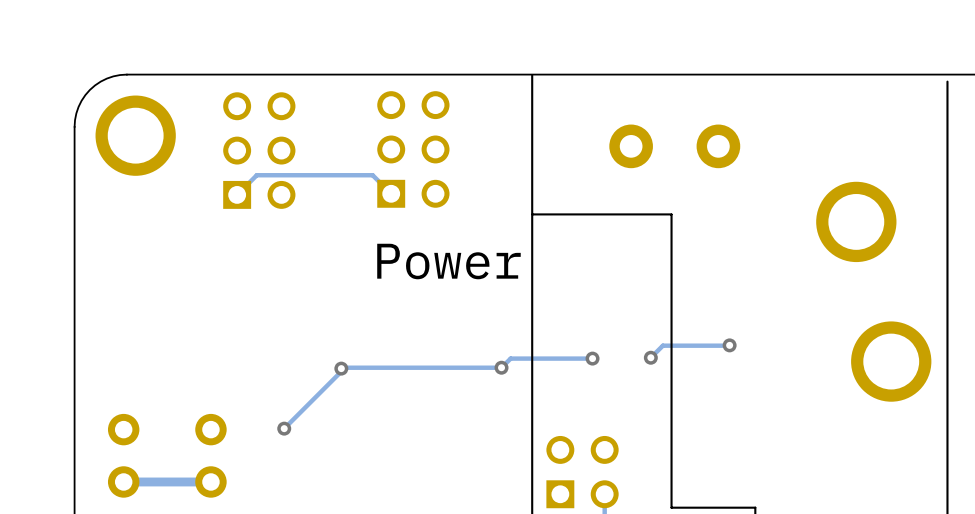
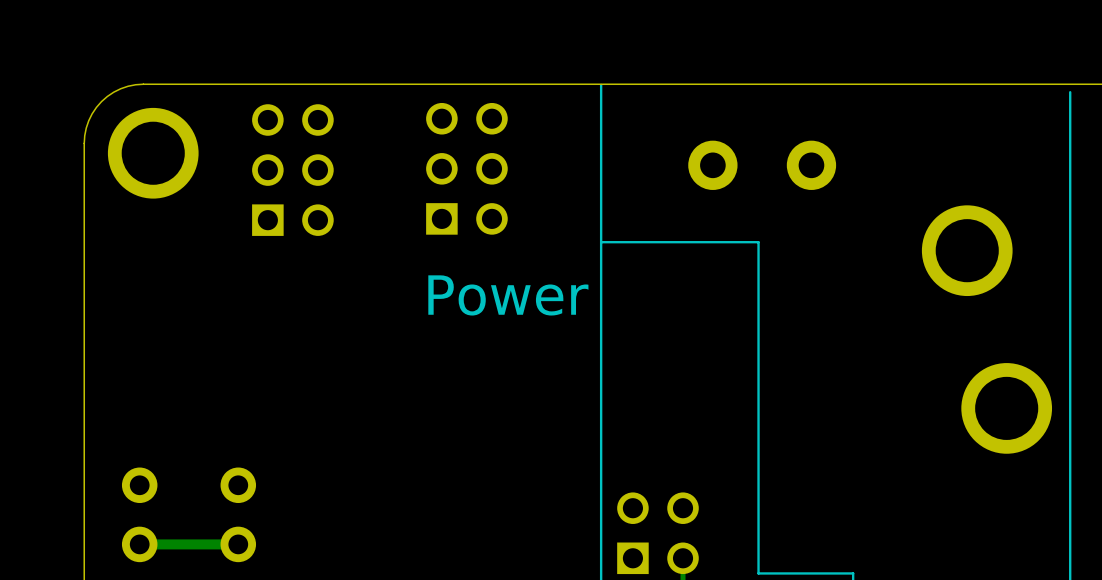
track: (391, 193) (372, 175) (256, 175) (237, 194) -> none
track: (729, 345) (662, 345) (650, 357) -> none
via: (729, 345) -> none
via: (650, 357) -> none
track: (592, 358) (510, 358) (501, 367) (342, 367) (341, 371) (284, 428) -> none
via: (592, 358) -> none
via: (501, 367) -> none
via: (341, 368) -> none
via: (284, 428) -> none

